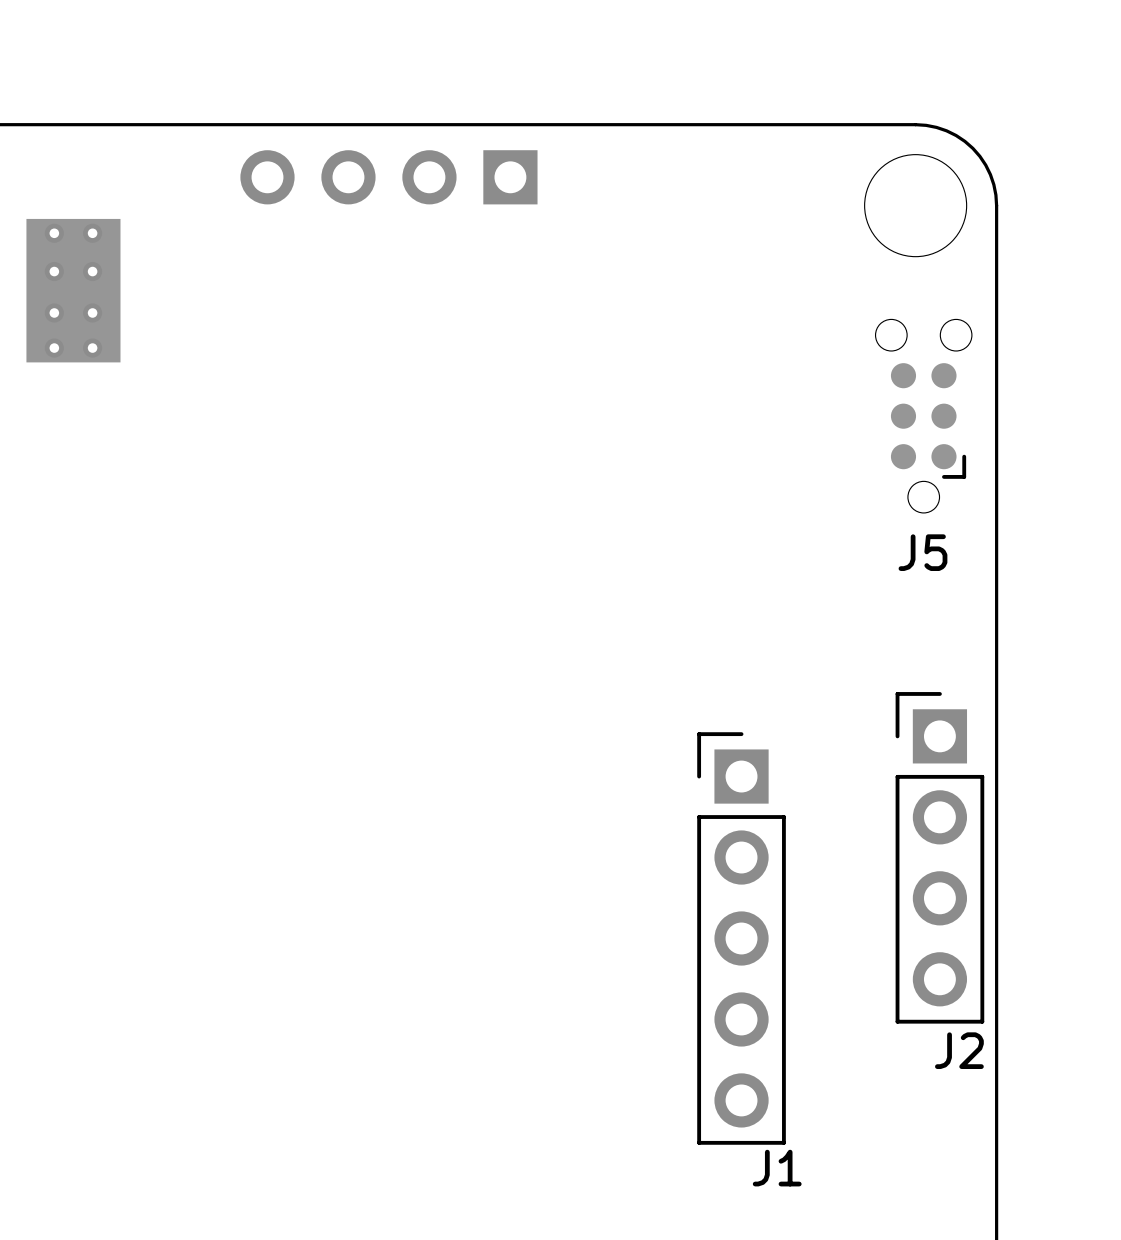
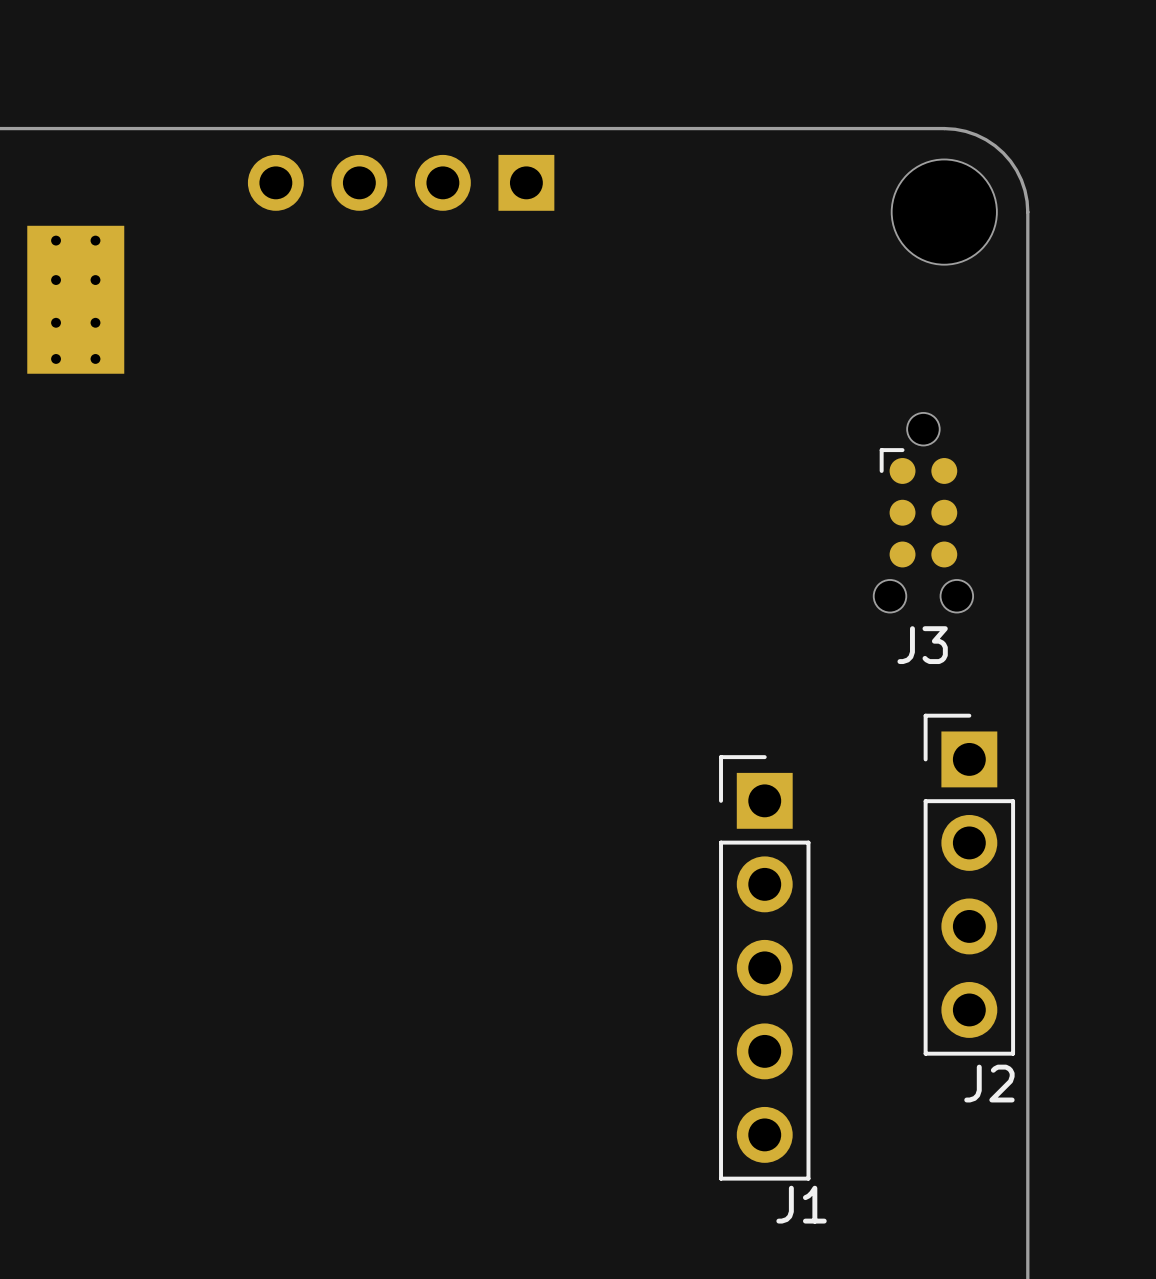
J5: (923, 416) -> none
J3: none -> (923, 512)

